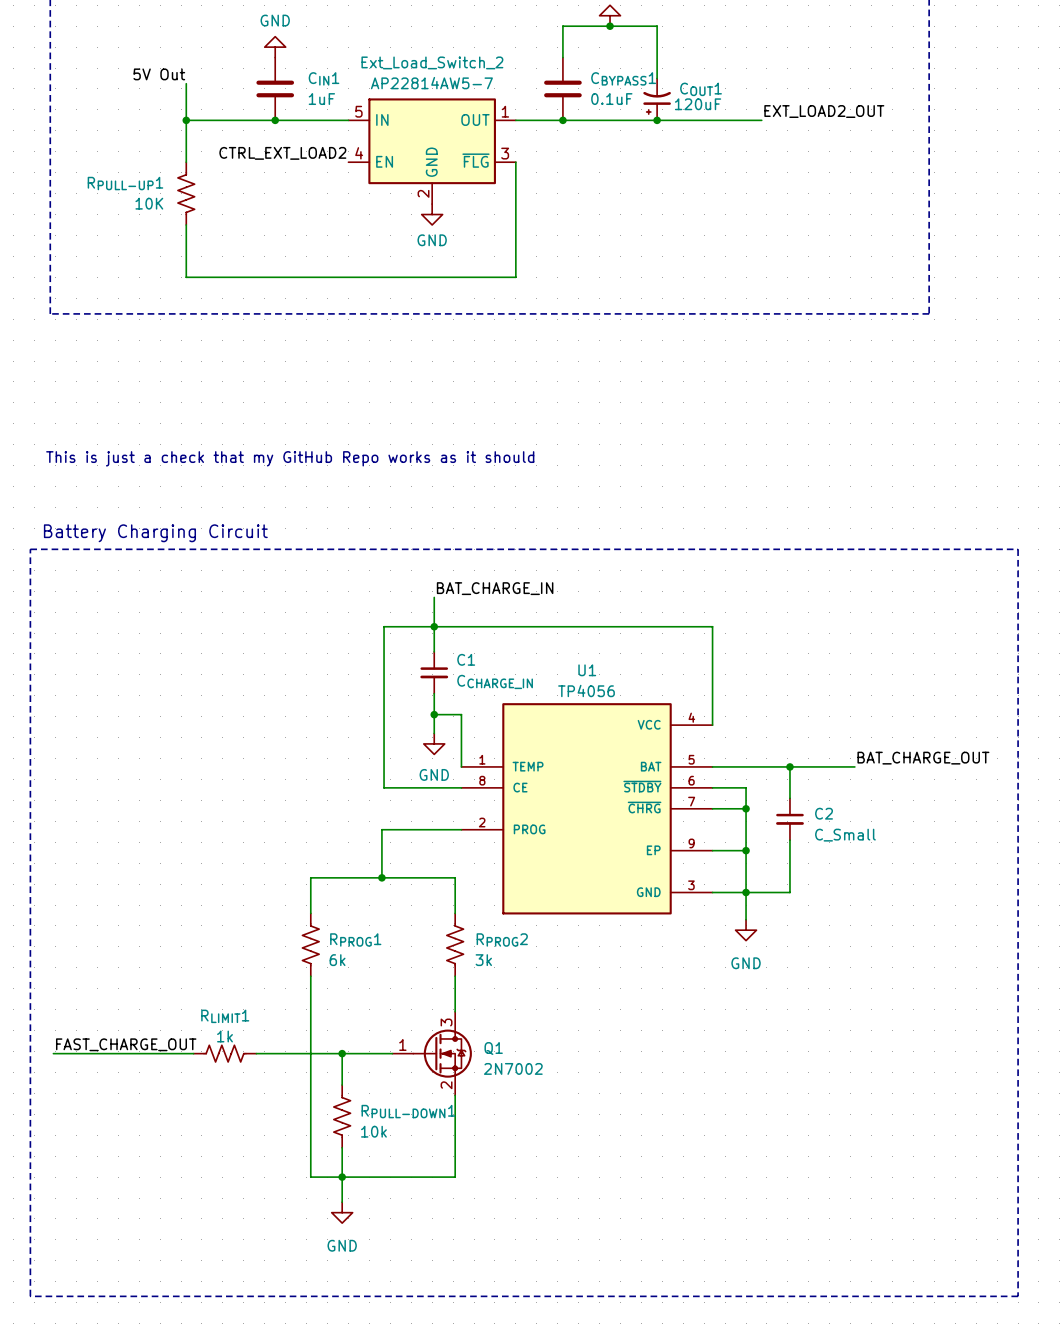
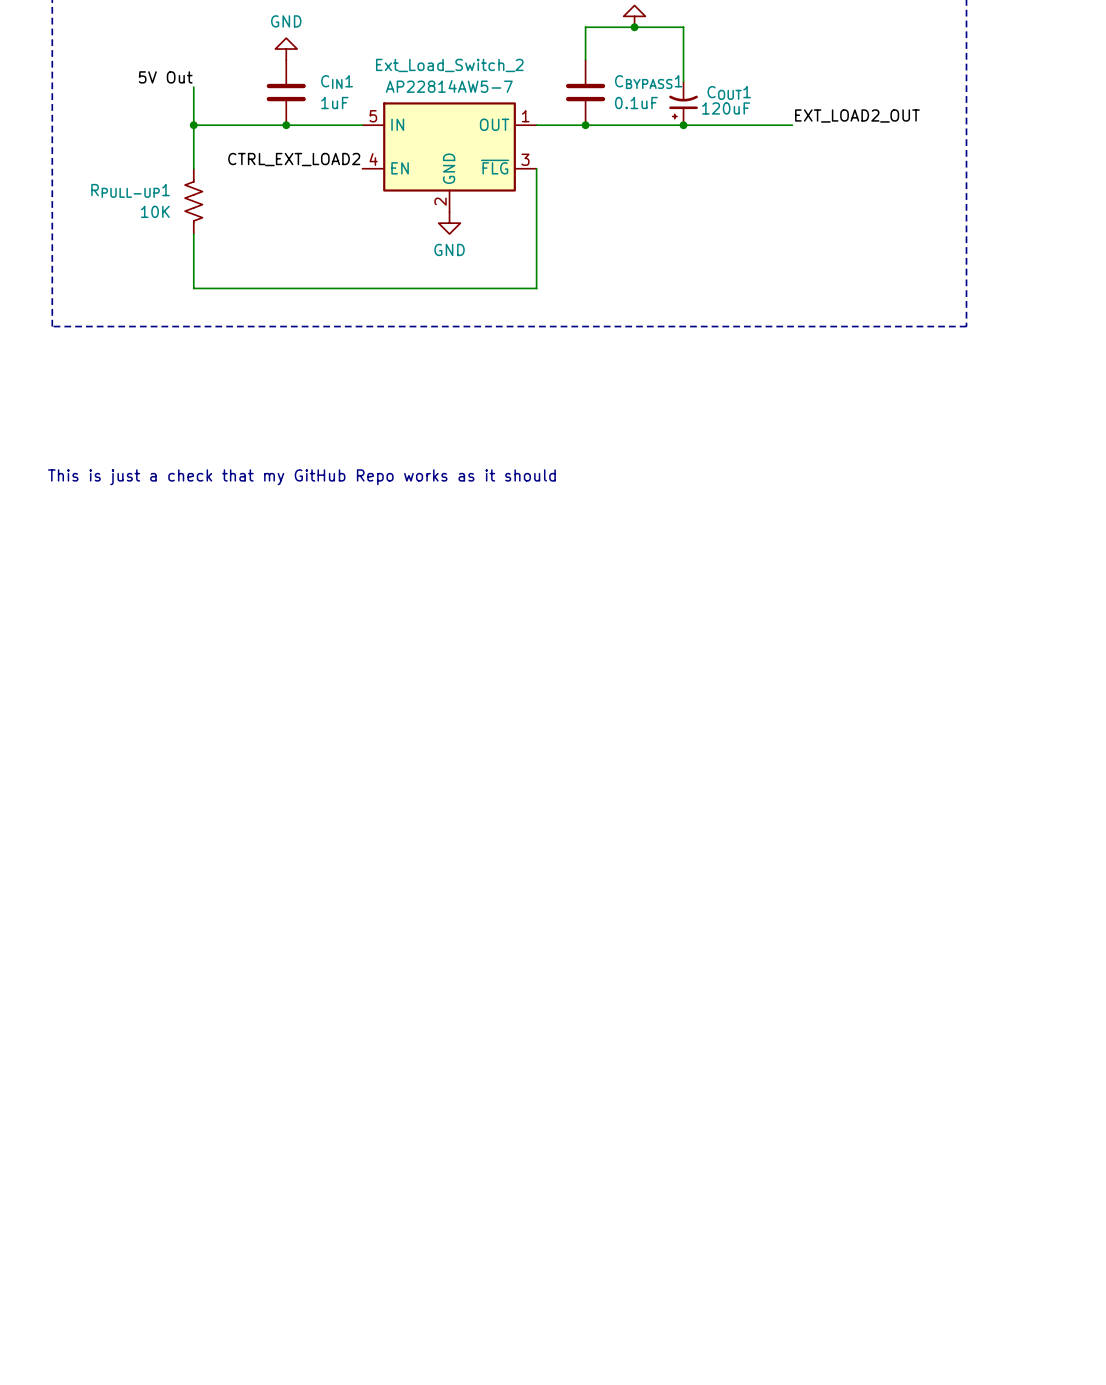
text: Battery Charging Circuit (155, 533) -> none
line: (30, 549) (1018, 549) (1018, 1296) (30, 1296) (30, 549) -> none
label: BAT_CHARGE_IN (495, 588) -> none
wire: (434, 597) (434, 651) -> none
junction: (434, 626) -> none
C1: CCHARGE_IN (434, 672) -> none
wire: (434, 693) (434, 733) -> none
wire: (434, 714) (461, 714) (461, 766) -> none
junction: (434, 714) -> none
wire: (712, 725) (712, 626) (384, 626) (384, 787) (461, 787) -> none
power symbol: GND (434, 743) -> none
label: BAT_CHARGE_OUT (923, 758) -> none
wire: (712, 766) (854, 766) -> none
wire: (789, 766) (789, 798) -> none
junction: (789, 766) -> none
wire: (712, 787) (746, 787) (746, 919) -> none
U1: TP4056 (587, 808) -> none
wire: (712, 808) (746, 808) -> none
junction: (746, 808) -> none
C2: C_Small (789, 819) -> none
wire: (461, 829) (381, 829) (381, 877) -> none
wire: (789, 840) (789, 892) (712, 892) -> none
wire: (712, 850) (746, 850) -> none
junction: (746, 850) -> none
junction: (381, 877) -> none
junction: (746, 892) -> none
wire: (310, 913) (310, 877) (455, 877) (455, 913) -> none
power symbol: GND (746, 930) -> none
RPROG1: 6k (310, 944) -> none
RPROG2: 3k (455, 944) -> none
wire: (310, 976) (310, 1177) (455, 1177) (455, 1095) -> none
wire: (455, 976) (455, 1011) -> none
label: FAST_CHARGE_OUT (126, 1044) -> none
wire: (53, 1053) (193, 1053) -> none
RLIMIT1: 1k (224, 1053) -> none
wire: (256, 1053) (392, 1053) -> none
wire: (342, 1053) (342, 1085) -> none
junction: (342, 1053) -> none
Q1: 2N7002 (432, 1053) -> none
RPULL-DOWN1: 10k (342, 1116) -> none
wire: (342, 1147) (342, 1202) -> none
junction: (342, 1177) -> none
power symbol: GND (342, 1212) -> none

